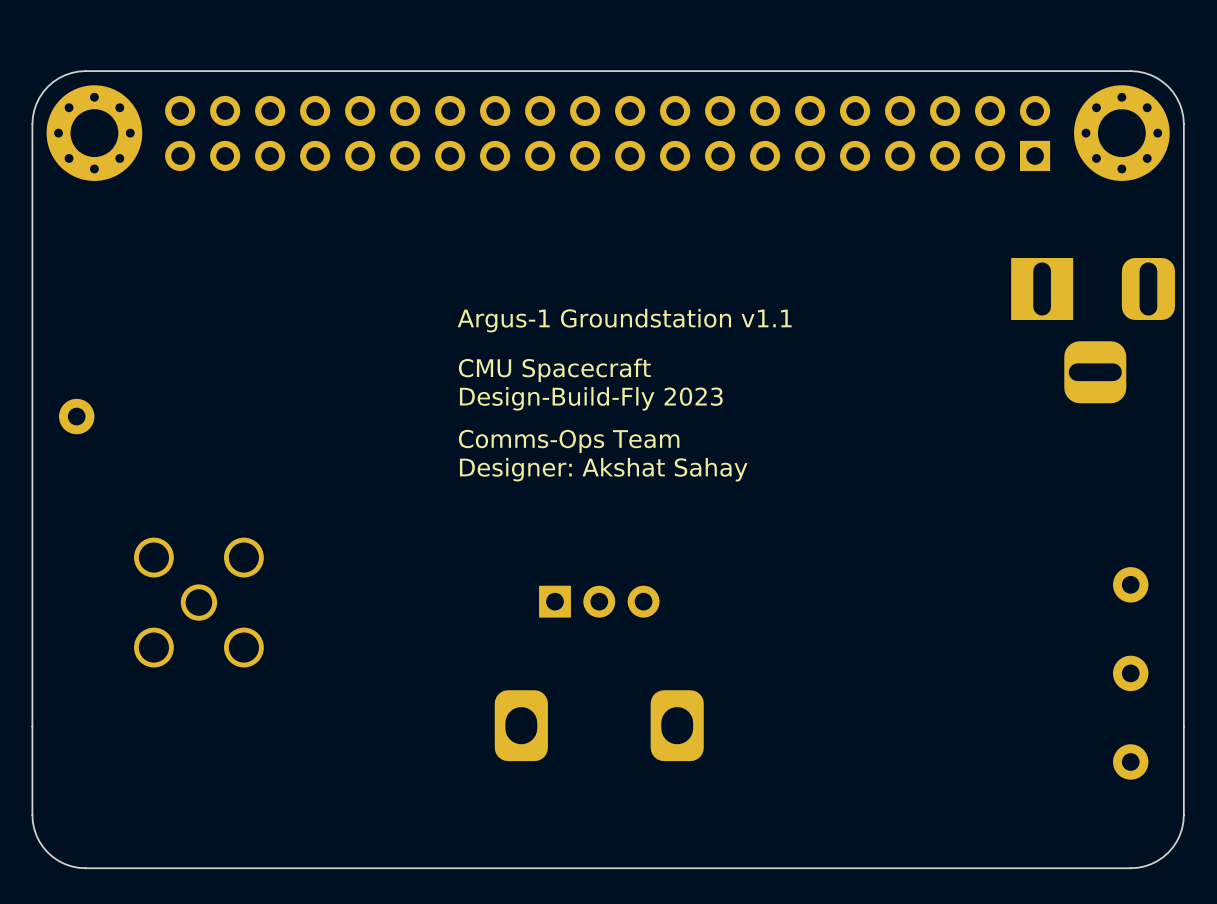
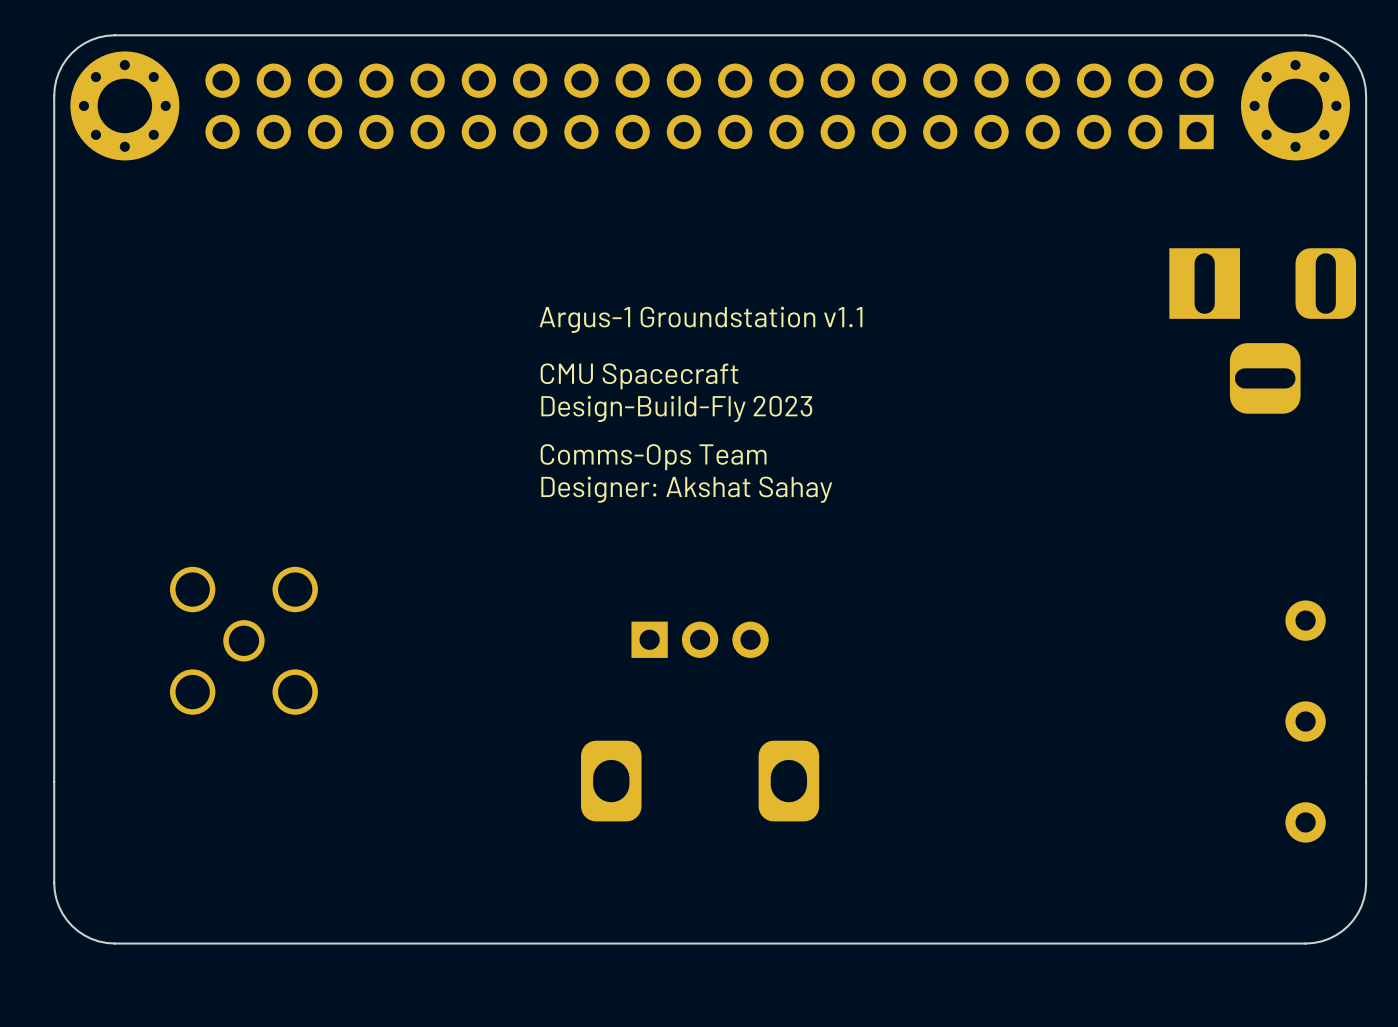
part: (76, 416) -> none

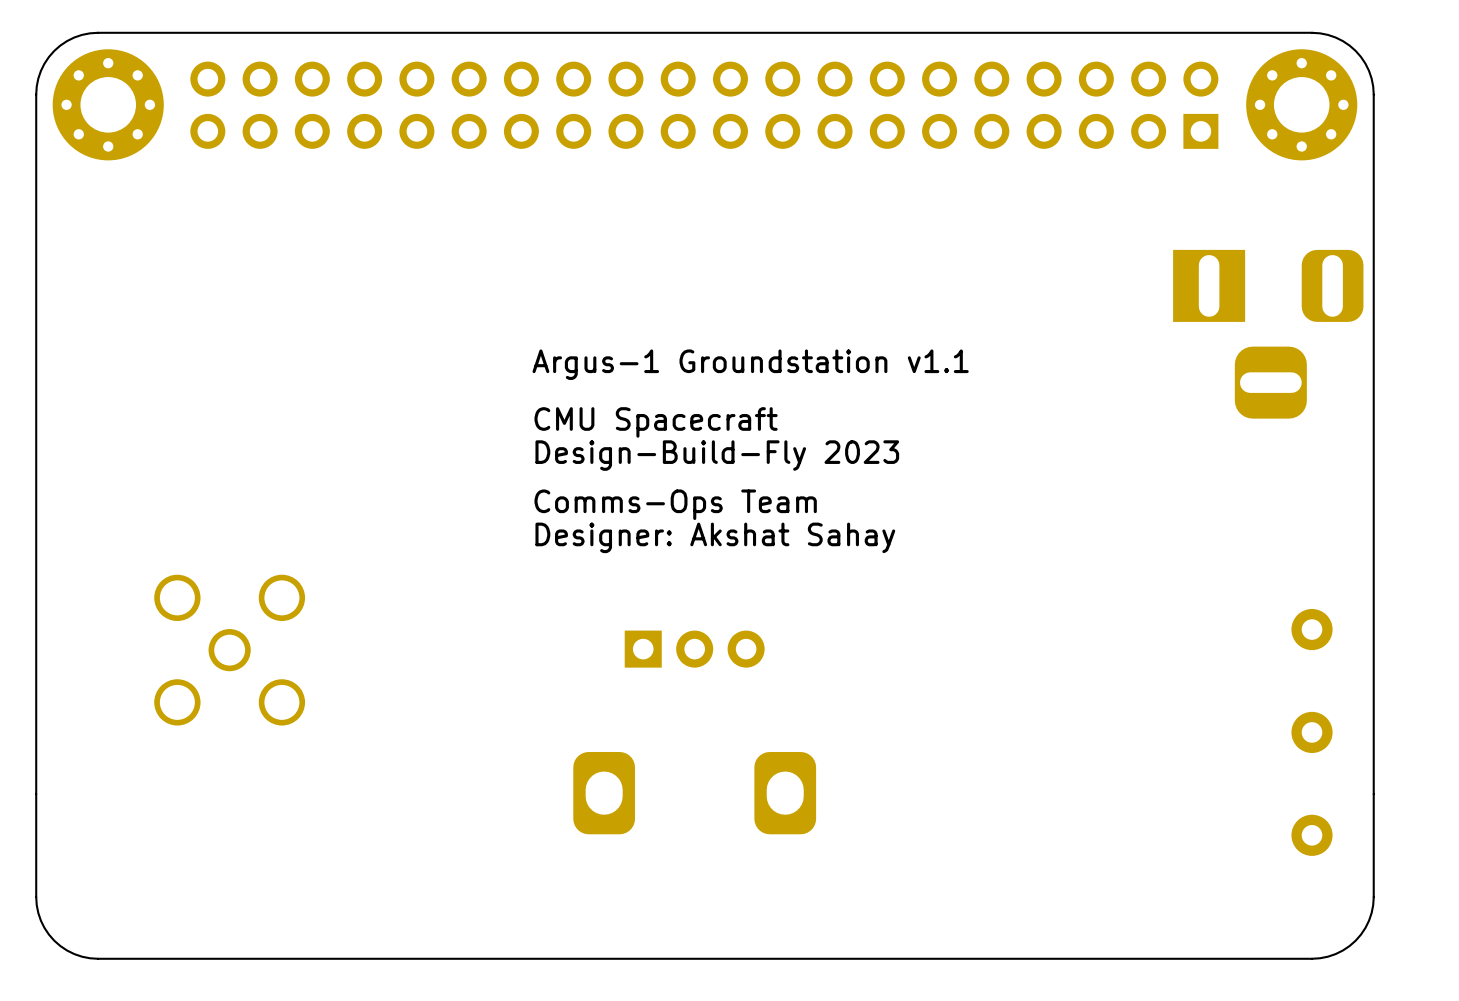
text position: Argus-1 Groundstation v1.1 (700, 319) -> Argus-1 Groundstation v1.1 (750, 364)
text: CMU Spacecraft (639, 376) -> none
text: Design-Build-Fly 2023 (676, 408) -> CMU Spacecraft (656, 422)
text: Comms-Ops Team (653, 457) -> Design-Build-Fly 2023 (717, 455)
text: Designer: Akshat Sahay (686, 489) -> Comms-Ops Team (675, 504)
text: none -> Designer: Akshat Sahay (715, 537)

